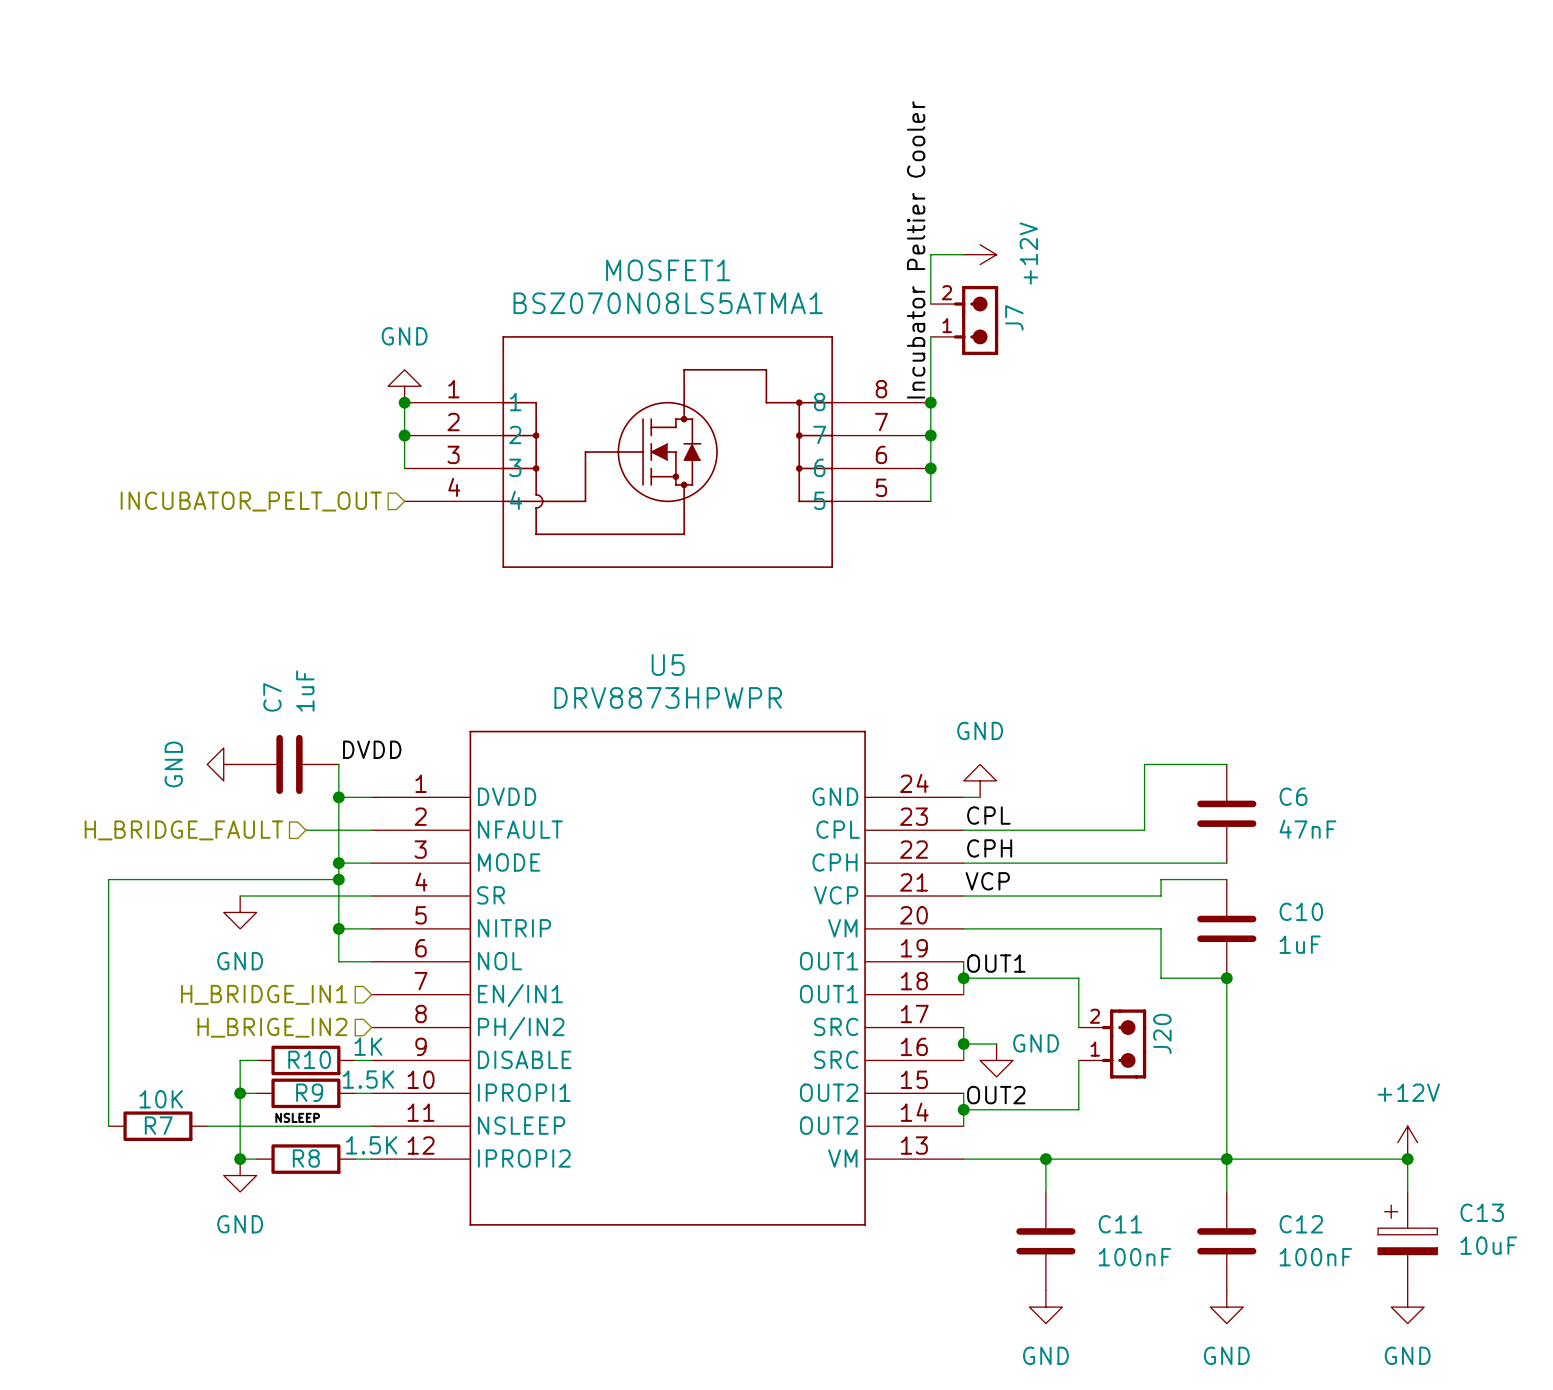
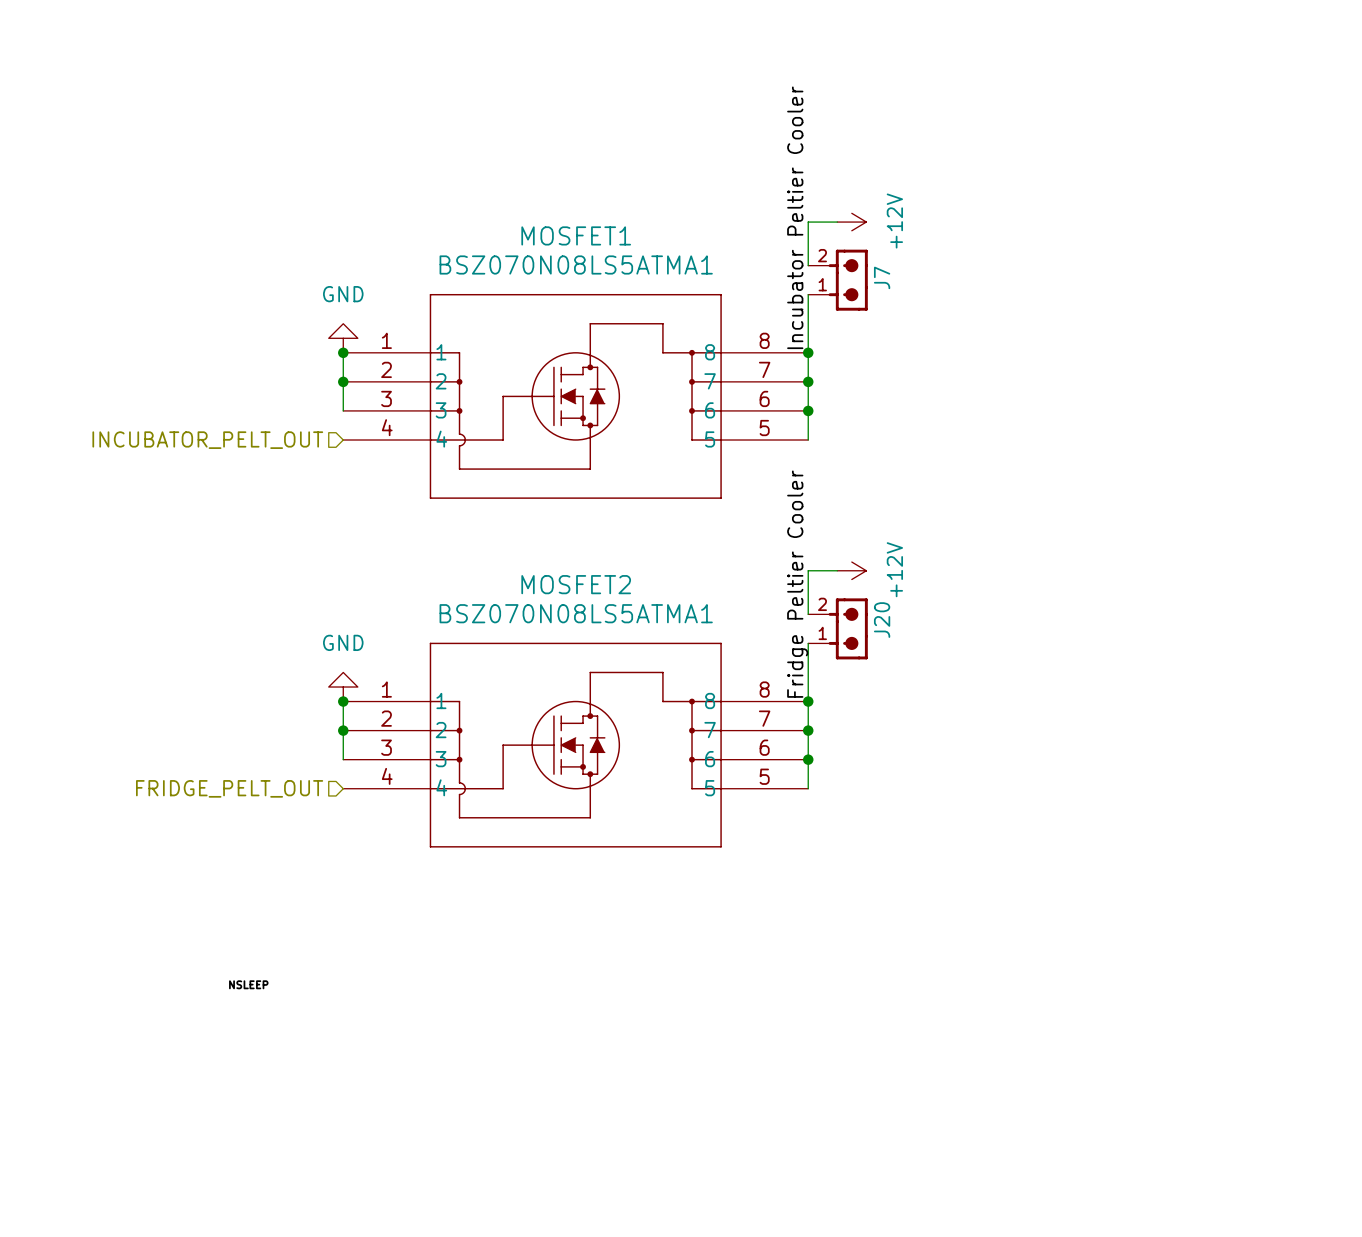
wire: none -> (837, 570) (808, 570) (808, 614)
power symbol: none -> +12V (851, 570)
label: none -> Fridge Peltier Cooler (797, 584)
wire: none -> (808, 643) (808, 788)
label: DVDD (372, 749) -> none
power symbol: GND (223, 764) -> none
C7: 1uF (289, 764) -> none
wire: (338, 764) (338, 961) (371, 961) -> none
wire: (1226, 764) (1144, 764) (1144, 830) (963, 830) -> none
power symbol: none -> GND (343, 687)
power symbol: GND (980, 780) -> none
wire: (338, 797) (371, 797) -> none
junction: (338, 797) -> none
wire: none -> (343, 701) (343, 759)
junction: none -> (343, 701)
junction: none -> (808, 701)
wire: (963, 797) (980, 797) -> none
C6: 47nF (1226, 813) -> none
label: CPL (988, 815) -> none
hierarchical label: H_BRIDGE_FAULT (183, 830) -> none
wire: (305, 830) (371, 830) -> none
junction: none -> (343, 730)
junction: none -> (808, 730)
MOSFET2: none -> BSZ070N08LS5ATMA1 (575, 745)
label: CPH (989, 848) -> none
wire: (338, 863) (371, 863) -> none
junction: (338, 863) -> none
junction: none -> (808, 759)
wire: (963, 863) (1226, 863) -> none
wire: (338, 879) (108, 879) (108, 1126) -> none
junction: (338, 879) -> none
wire: (1226, 879) (1161, 879) (1161, 896) (963, 896) -> none
label: VCP (987, 881) -> none
wire: (240, 896) (371, 896) -> none
hierarchical label: none -> FRIDGE_PELT_OUT (229, 788)
power symbol: GND (240, 912) -> none
wire: (338, 928) (371, 928) -> none
junction: (338, 928) -> none
wire: (963, 928) (1161, 928) (1161, 978) (1226, 978) (1226, 1191) -> none
C10: 1uF (1226, 928) -> none
wire: (963, 961) (963, 994) -> none
label: OUT1 (996, 963) -> none
U5: DRV8873HPWPR (667, 978) -> none
wire: (963, 978) (1078, 978) (1078, 1027) -> none
junction: (963, 978) -> none
junction: (1226, 978) -> none
hierarchical label: H_BRIDGE_IN1 (264, 994) -> none
hierarchical label: H_BRIGE_IN2 (272, 1027) -> none
wire: (963, 1027) (963, 1060) -> none
wire: (963, 1044) (996, 1044) -> none
junction: (963, 1044) -> none
J20 position: (1112, 1044) -> (838, 628)
wire: (256, 1060) (240, 1060) (240, 1159) (256, 1159) -> none
R10: 1K (305, 1060) -> none
wire: (355, 1060) (371, 1060) -> none
power symbol: GND (996, 1060) -> none
wire: (1078, 1060) (1078, 1109) (963, 1109) -> none
wire: (240, 1093) (256, 1093) -> none
junction: (240, 1093) -> none
R9: 1.5K (305, 1093) -> none
wire: (355, 1093) (371, 1093) -> none
wire: (963, 1093) (963, 1126) -> none
label: OUT2 (996, 1095) -> none
junction: (963, 1109) -> none
R7: 10K (157, 1126) -> none
wire: (207, 1126) (371, 1126) -> none
power symbol: +12V (1407, 1142) -> none
junction: (240, 1159) -> none
R8: 1.5K (305, 1159) -> none
wire: (355, 1159) (371, 1159) -> none
wire: (963, 1159) (1407, 1159) (1407, 1191) -> none
wire: (1045, 1159) (1045, 1191) -> none
junction: (1045, 1159) -> none
junction: (1226, 1159) -> none
junction: (1407, 1159) -> none
power symbol: GND (240, 1175) -> none
C11: 100nF (1045, 1241) -> none
C12: 100nF (1226, 1241) -> none
C13: 10uF (1407, 1241) -> none
power symbol: GND (1045, 1307) -> none
power symbol: GND (1226, 1307) -> none
power symbol: GND (1407, 1307) -> none

